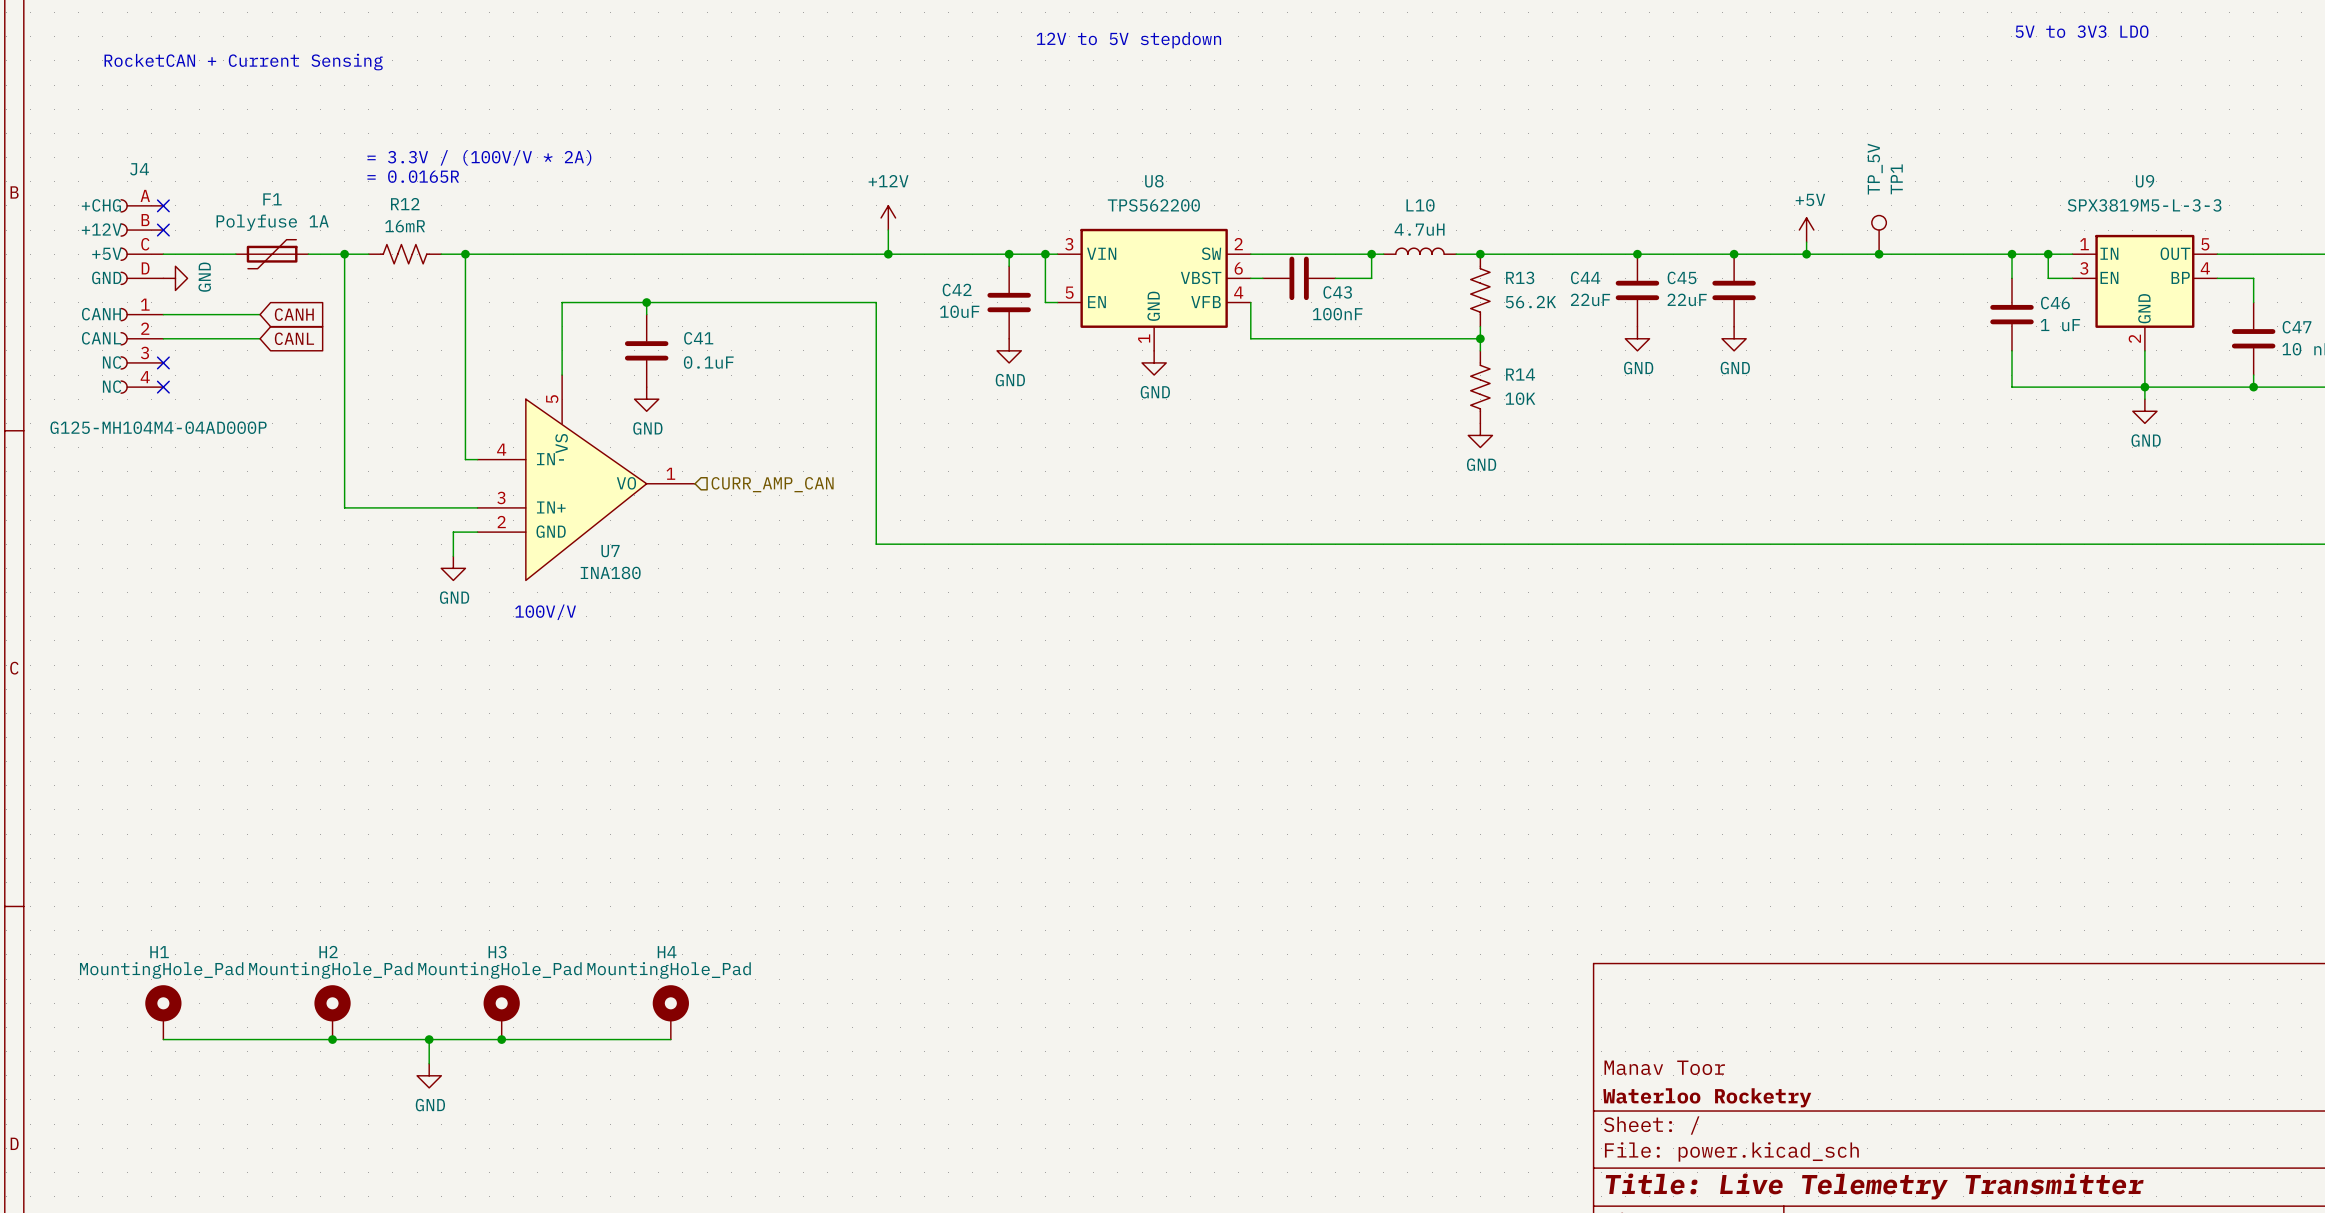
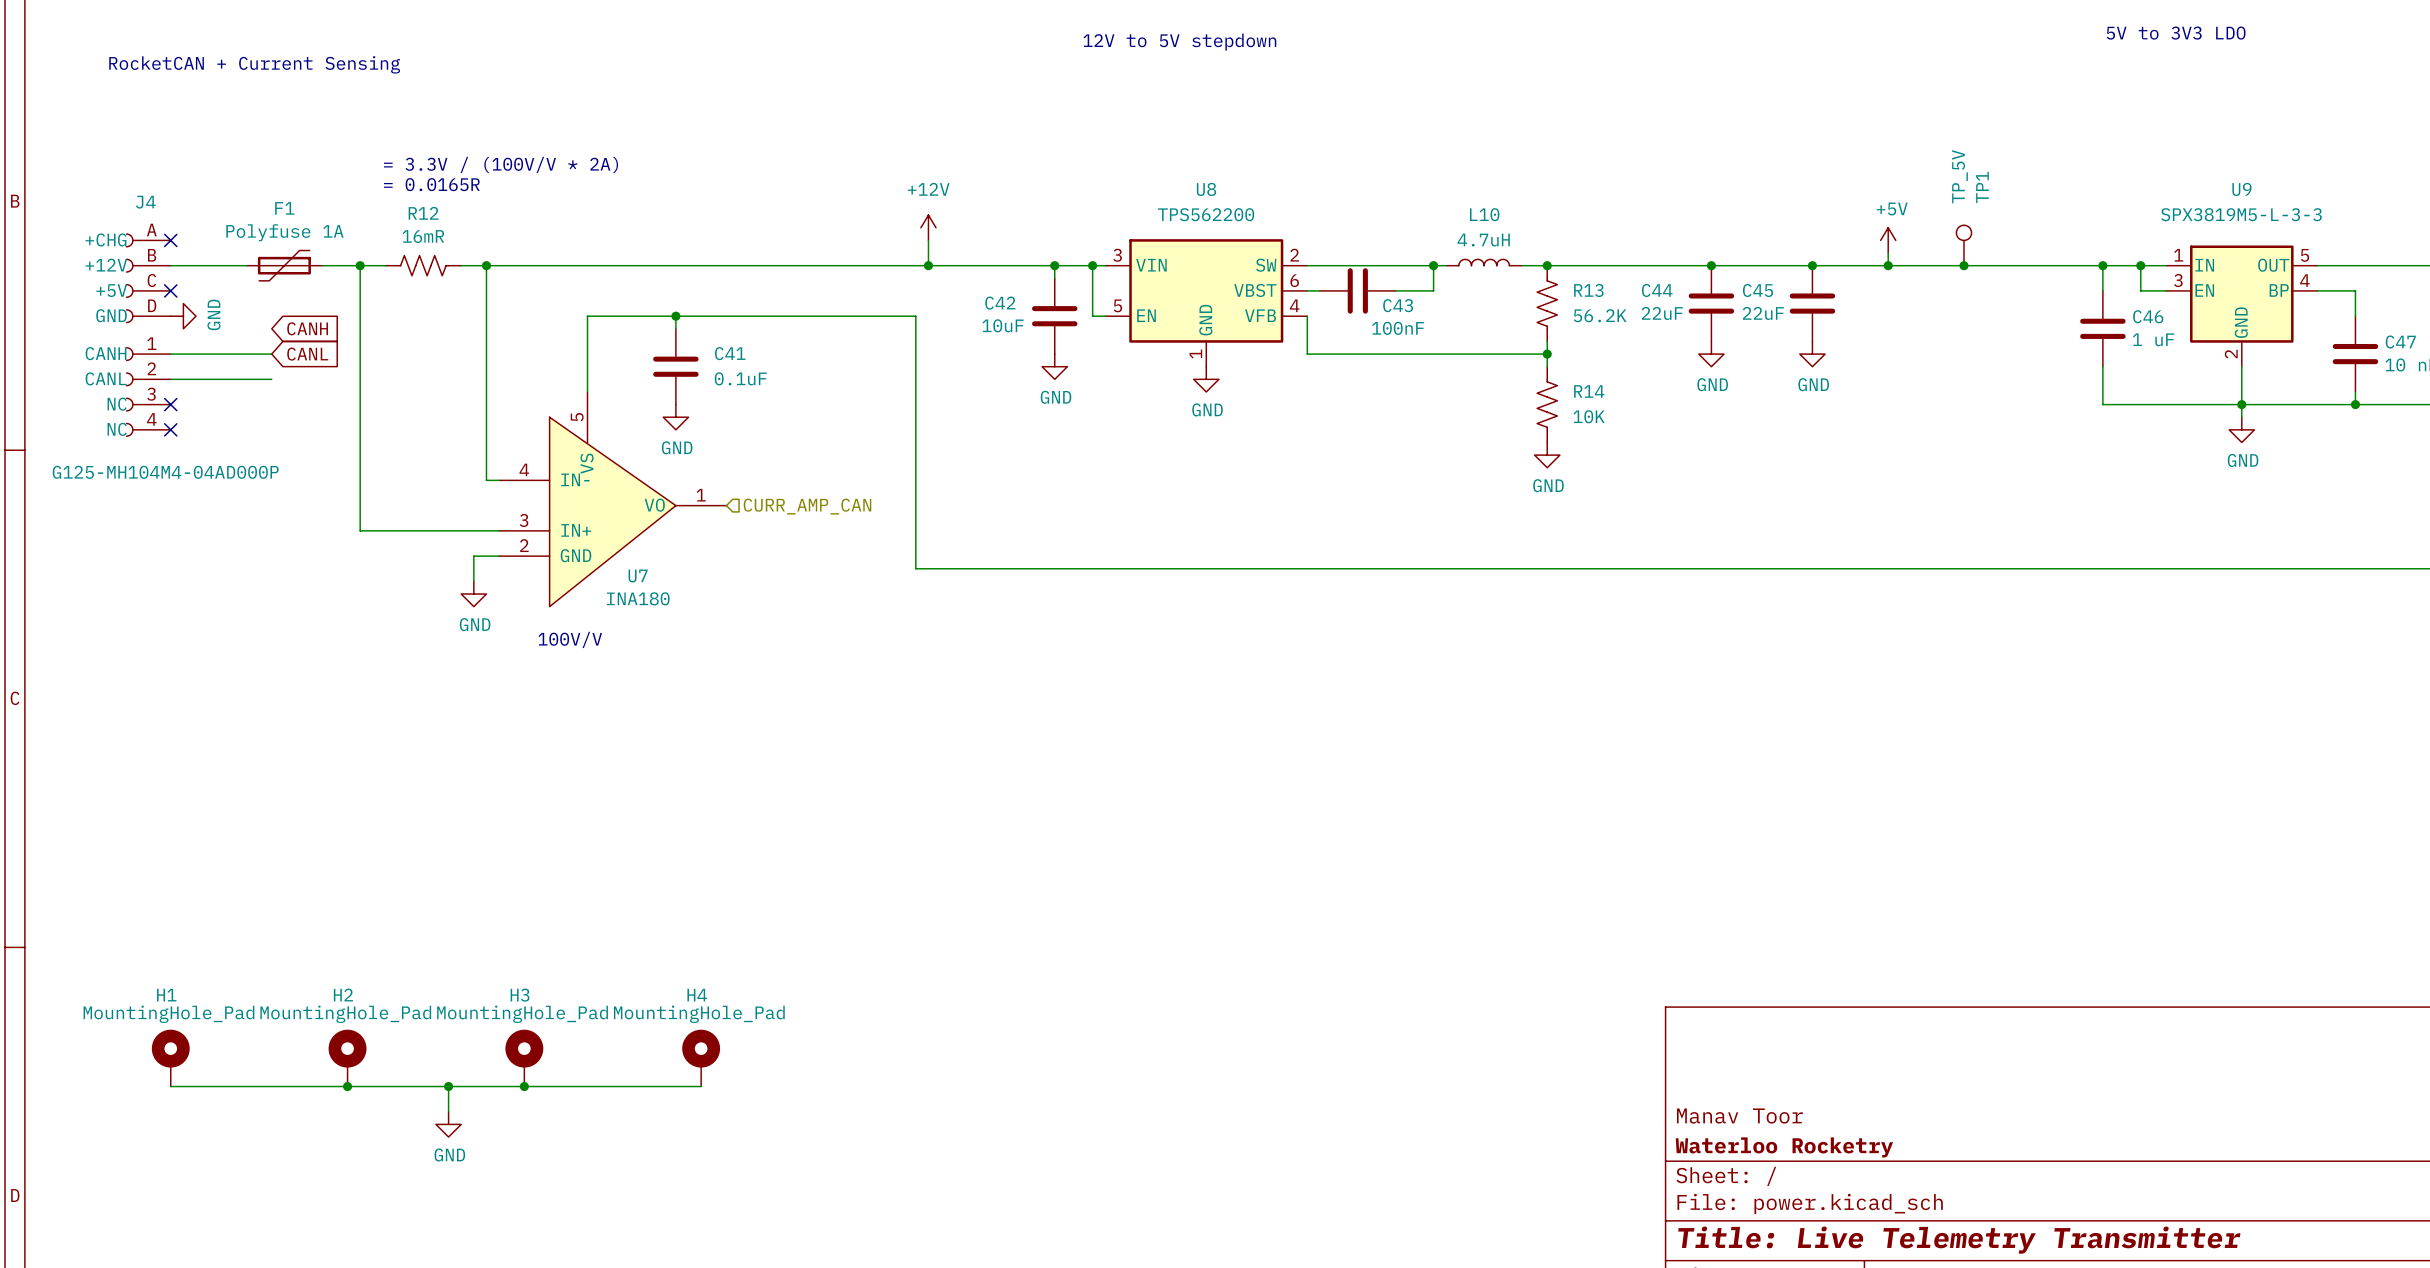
no-connect mark: (163, 205) -> none
no-connect mark: none -> (170, 290)
power symbol position: GND (175, 278) -> GND (183, 316)
J4 position: (142, 296) -> (148, 335)
wire: (163, 314) (260, 314) -> (170, 379) (271, 379)
no-connect mark: (163, 362) -> none
no-connect mark: none -> (170, 429)

